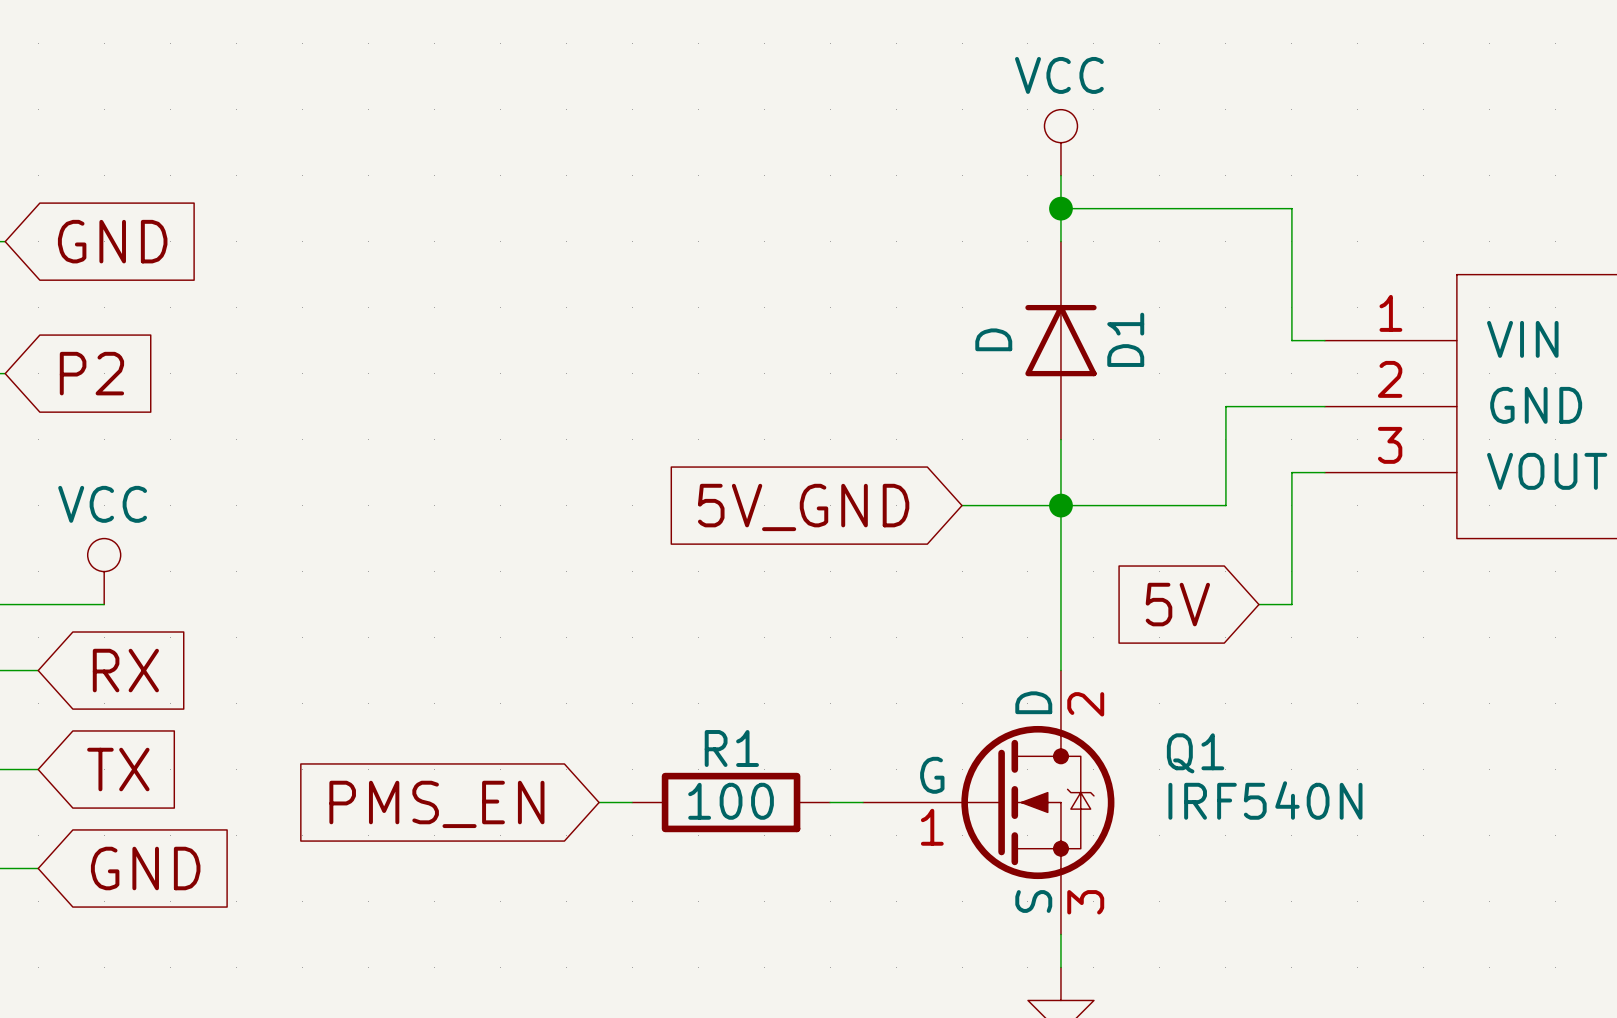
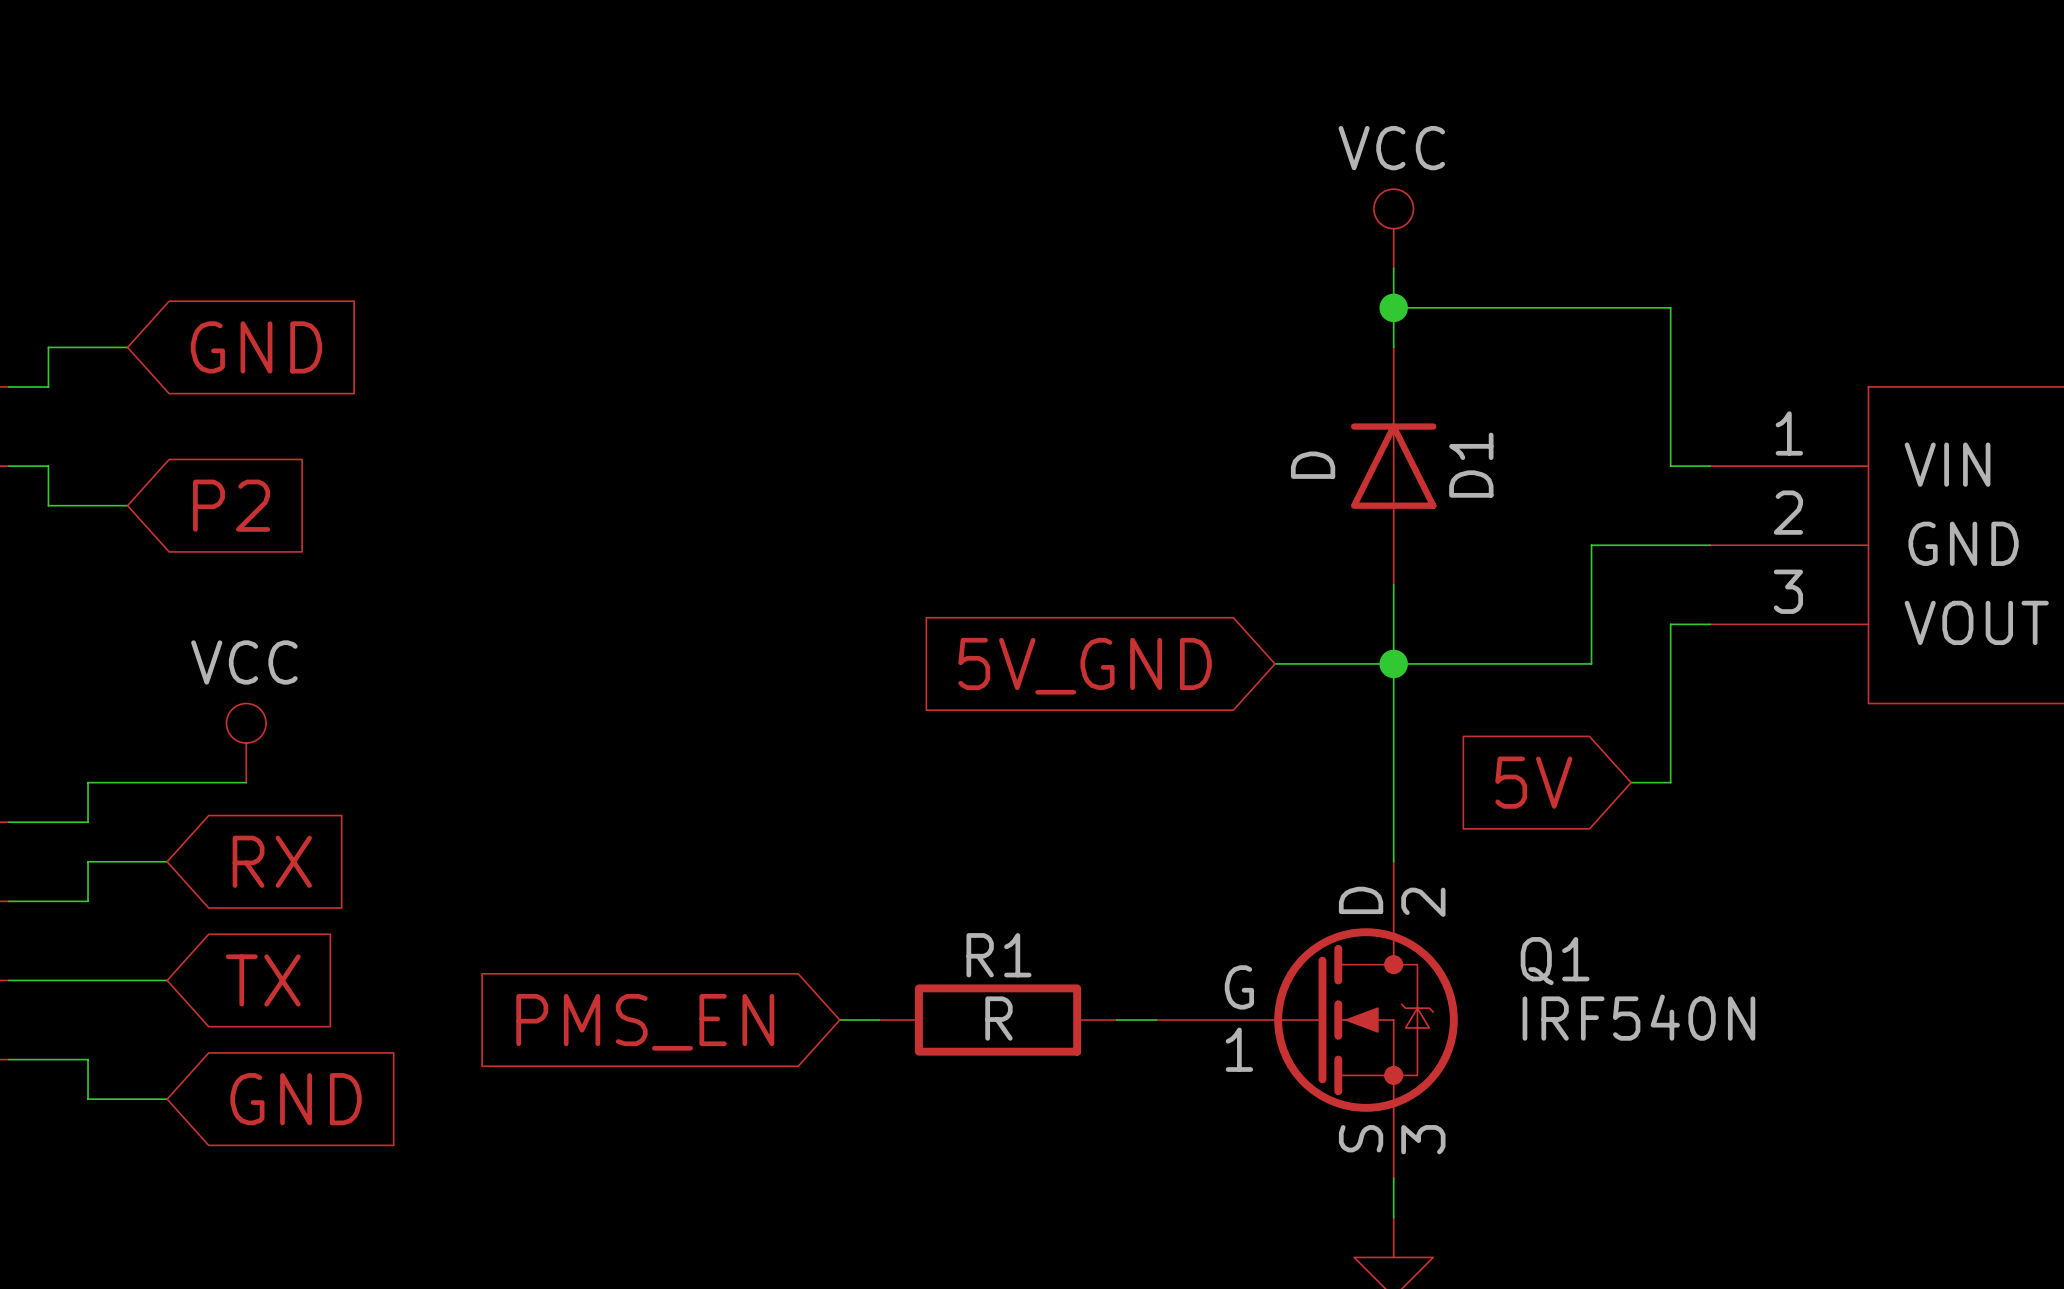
R1 value: 100 (731, 801) -> R (998, 1018)

